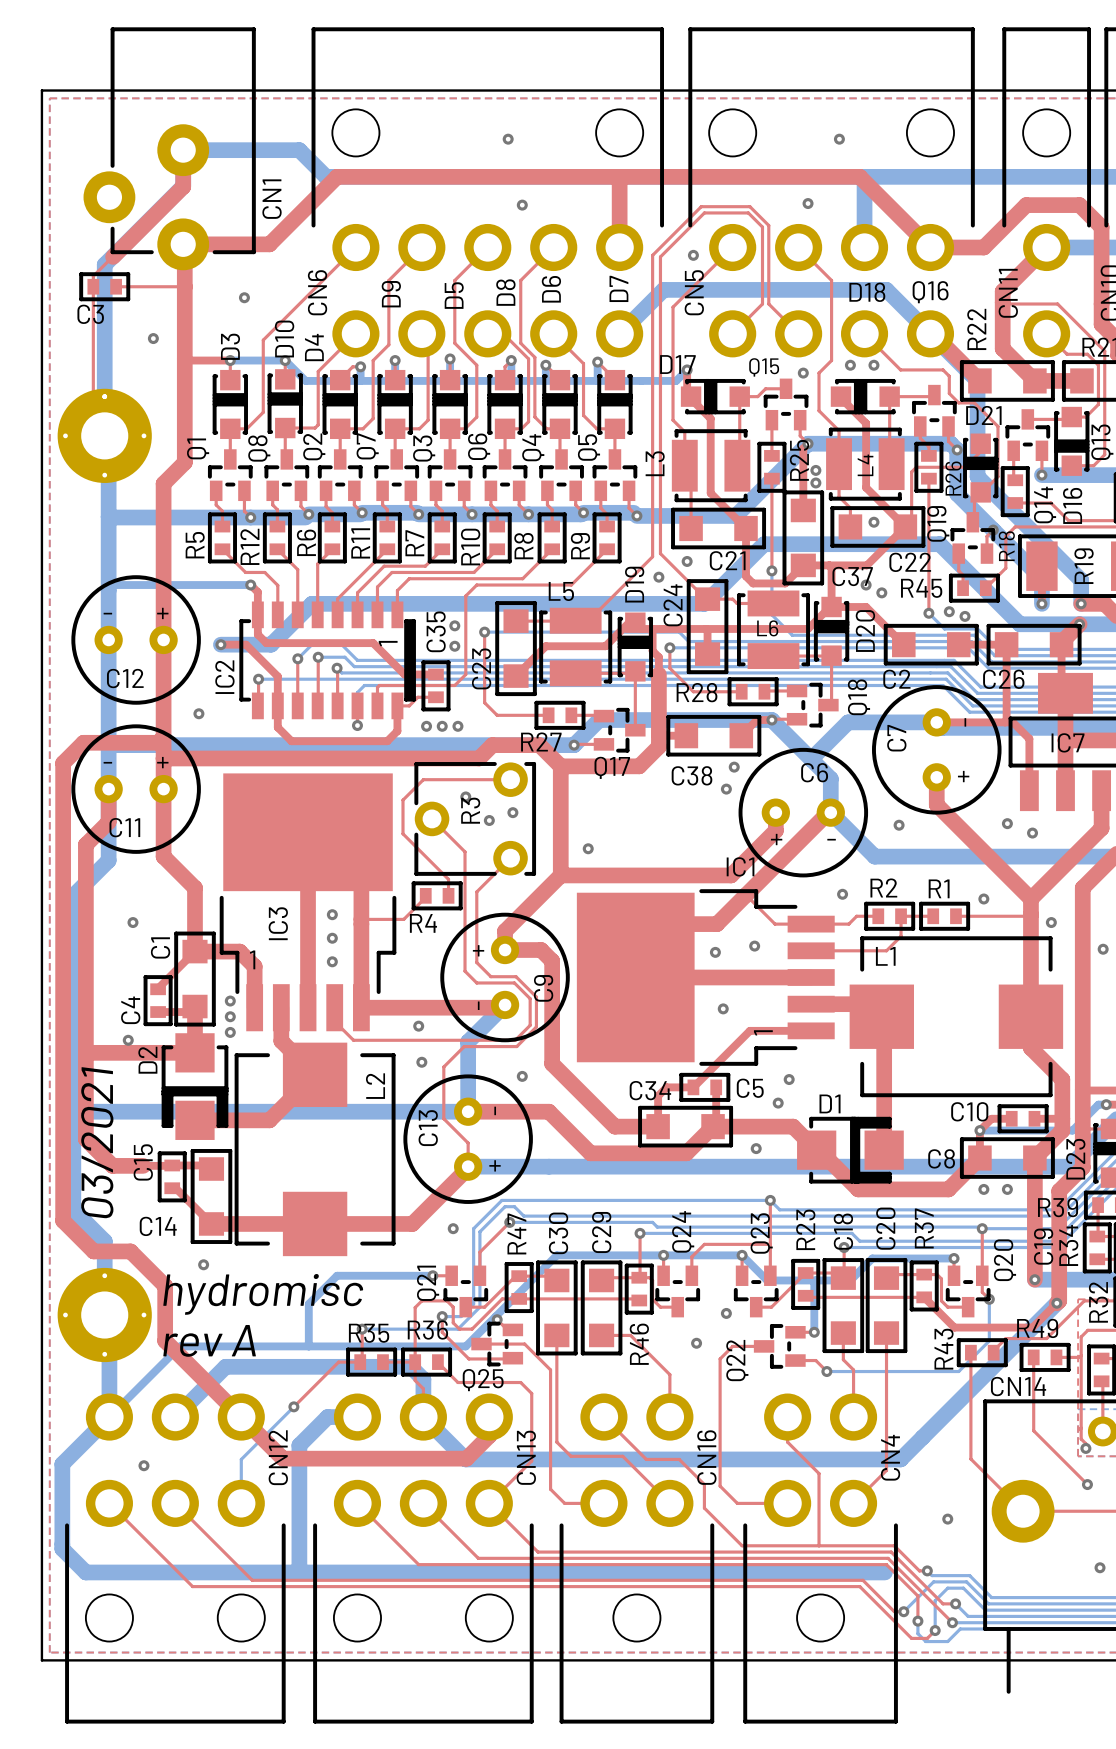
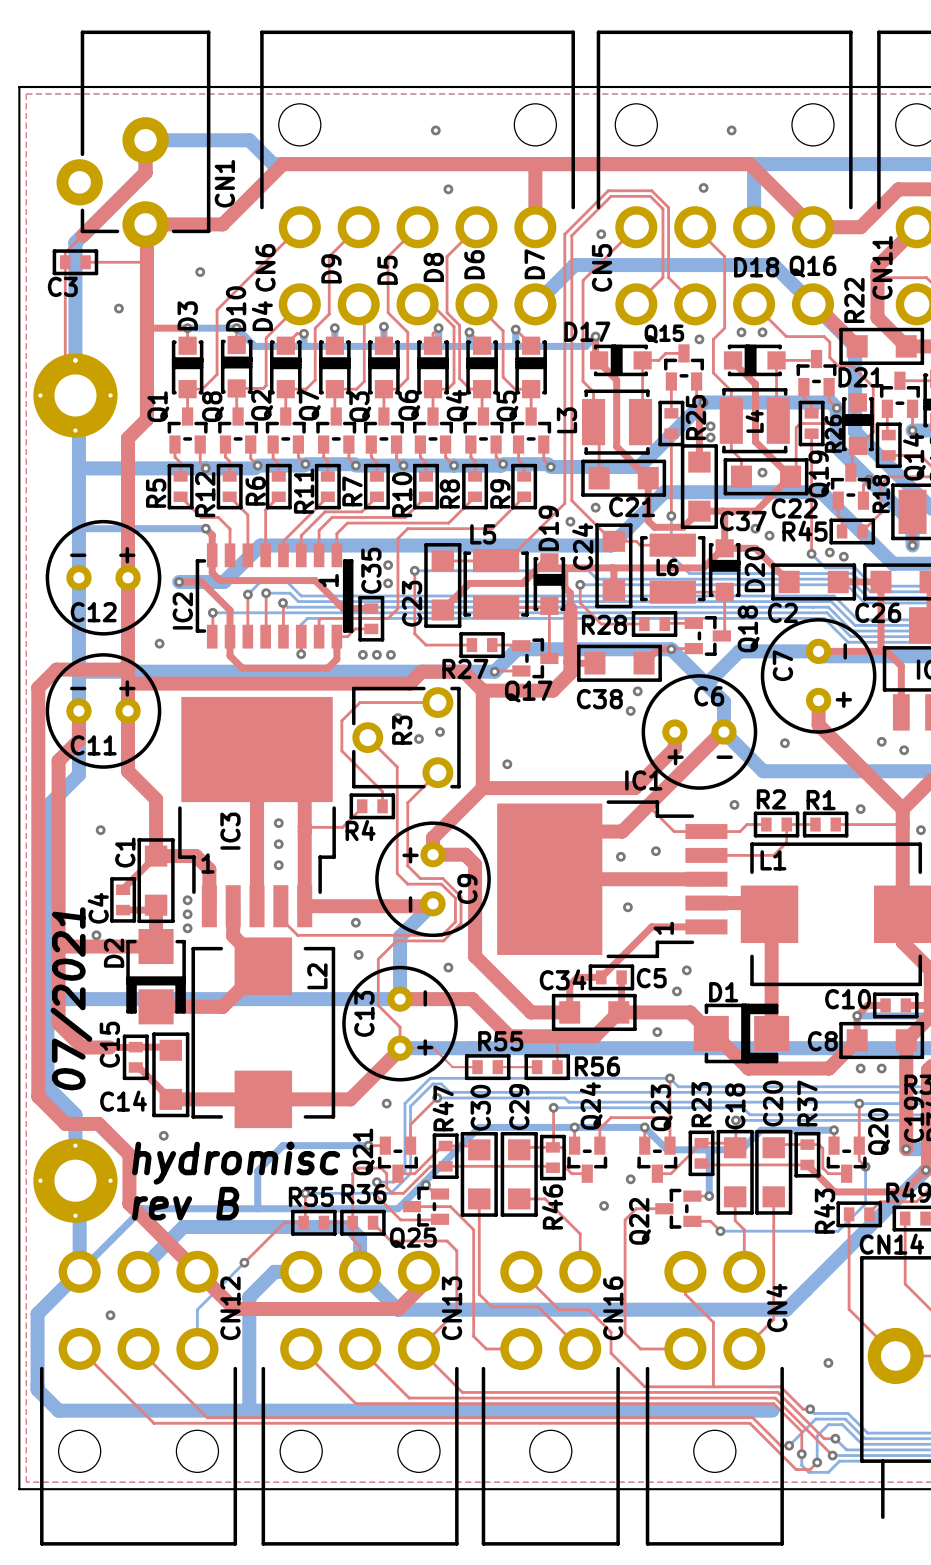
text: 03/2021 (97, 1142) -> 07/2021 (71, 998)
top track: none -> (560, 1036) (557, 1039) (557, 1067)
top track: none -> (400, 1048) (433, 1048) (452, 1067) (477, 1067)
R55: none -> (487, 1067)
top track: none -> (497, 1067) (537, 1067)
R56: none -> (547, 1067)
text: rev A (209, 1340) -> rev B (185, 1203)

